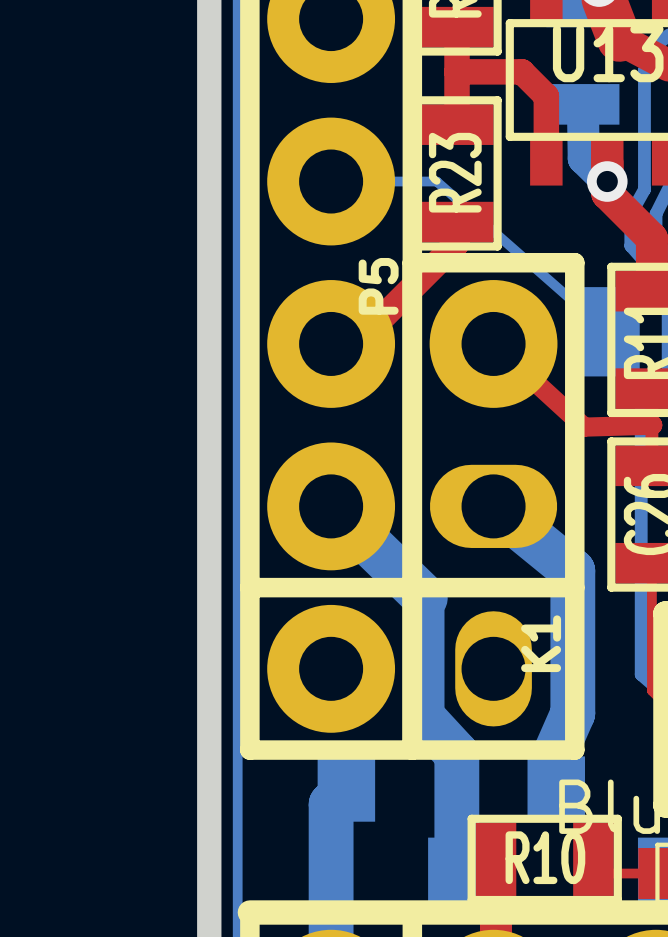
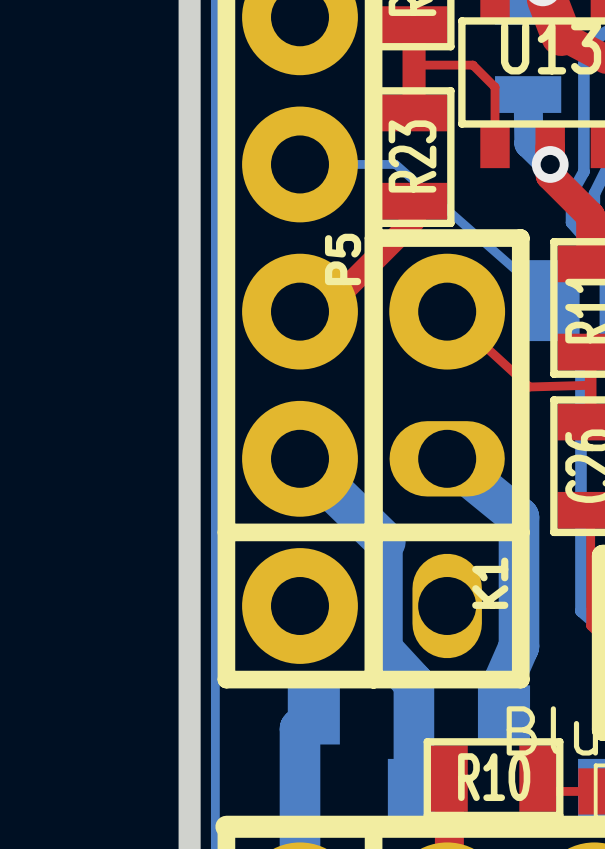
top track width: thick (457, 71) (521, 71) (546, 96) (546, 161) -> thin (414, 65) (472, 65) (495, 87) (495, 146)
top track width: thick (493, 343) (584, 427) (652, 425) -> thin (447, 311) (529, 386) (591, 385)

